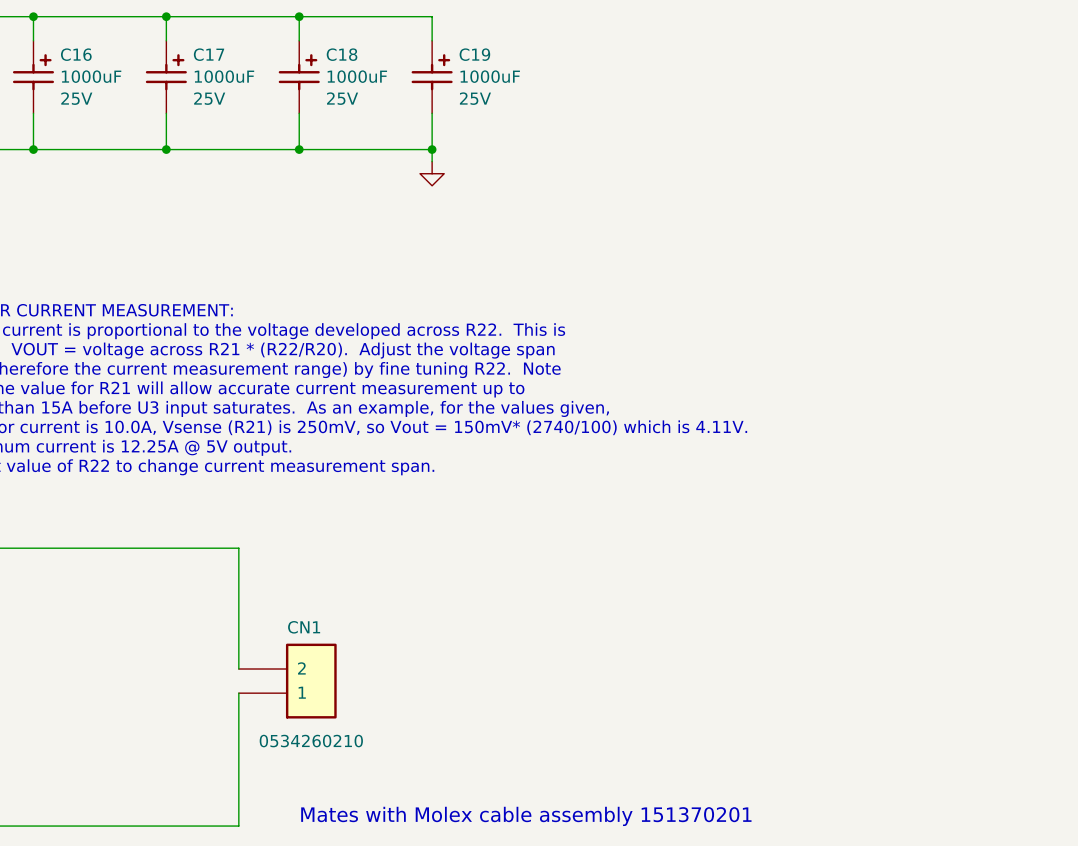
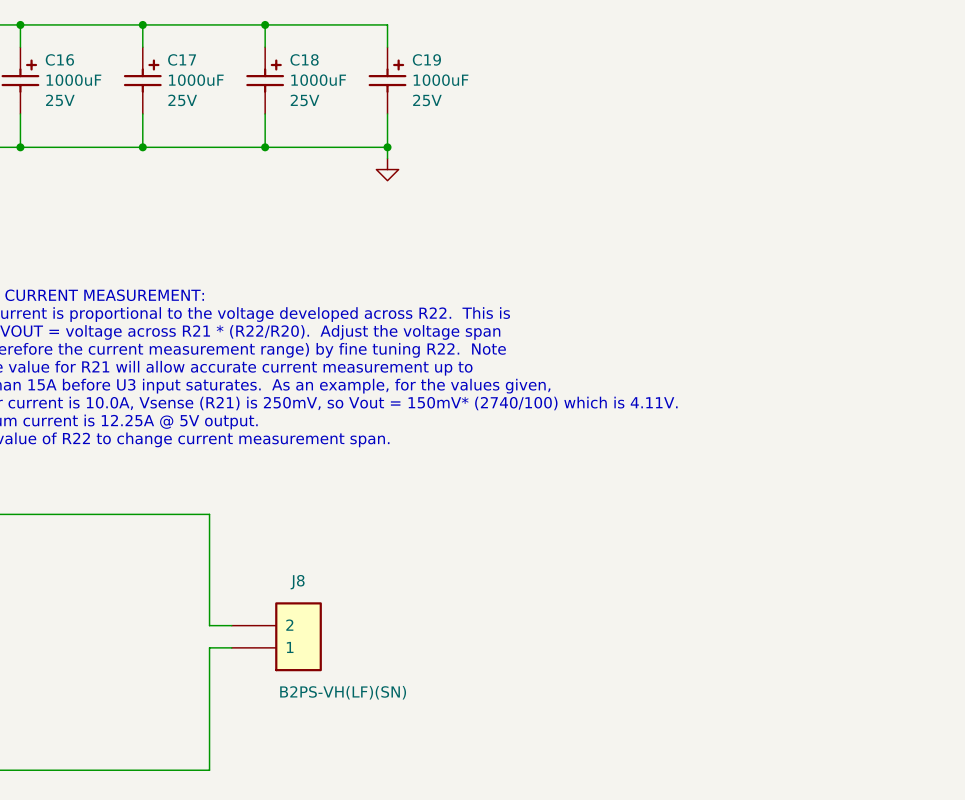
CN1: (287, 681) -> none
J8: none -> (276, 636)
text: Mates with Molex cable assembly 151370201 (526, 816) -> none

